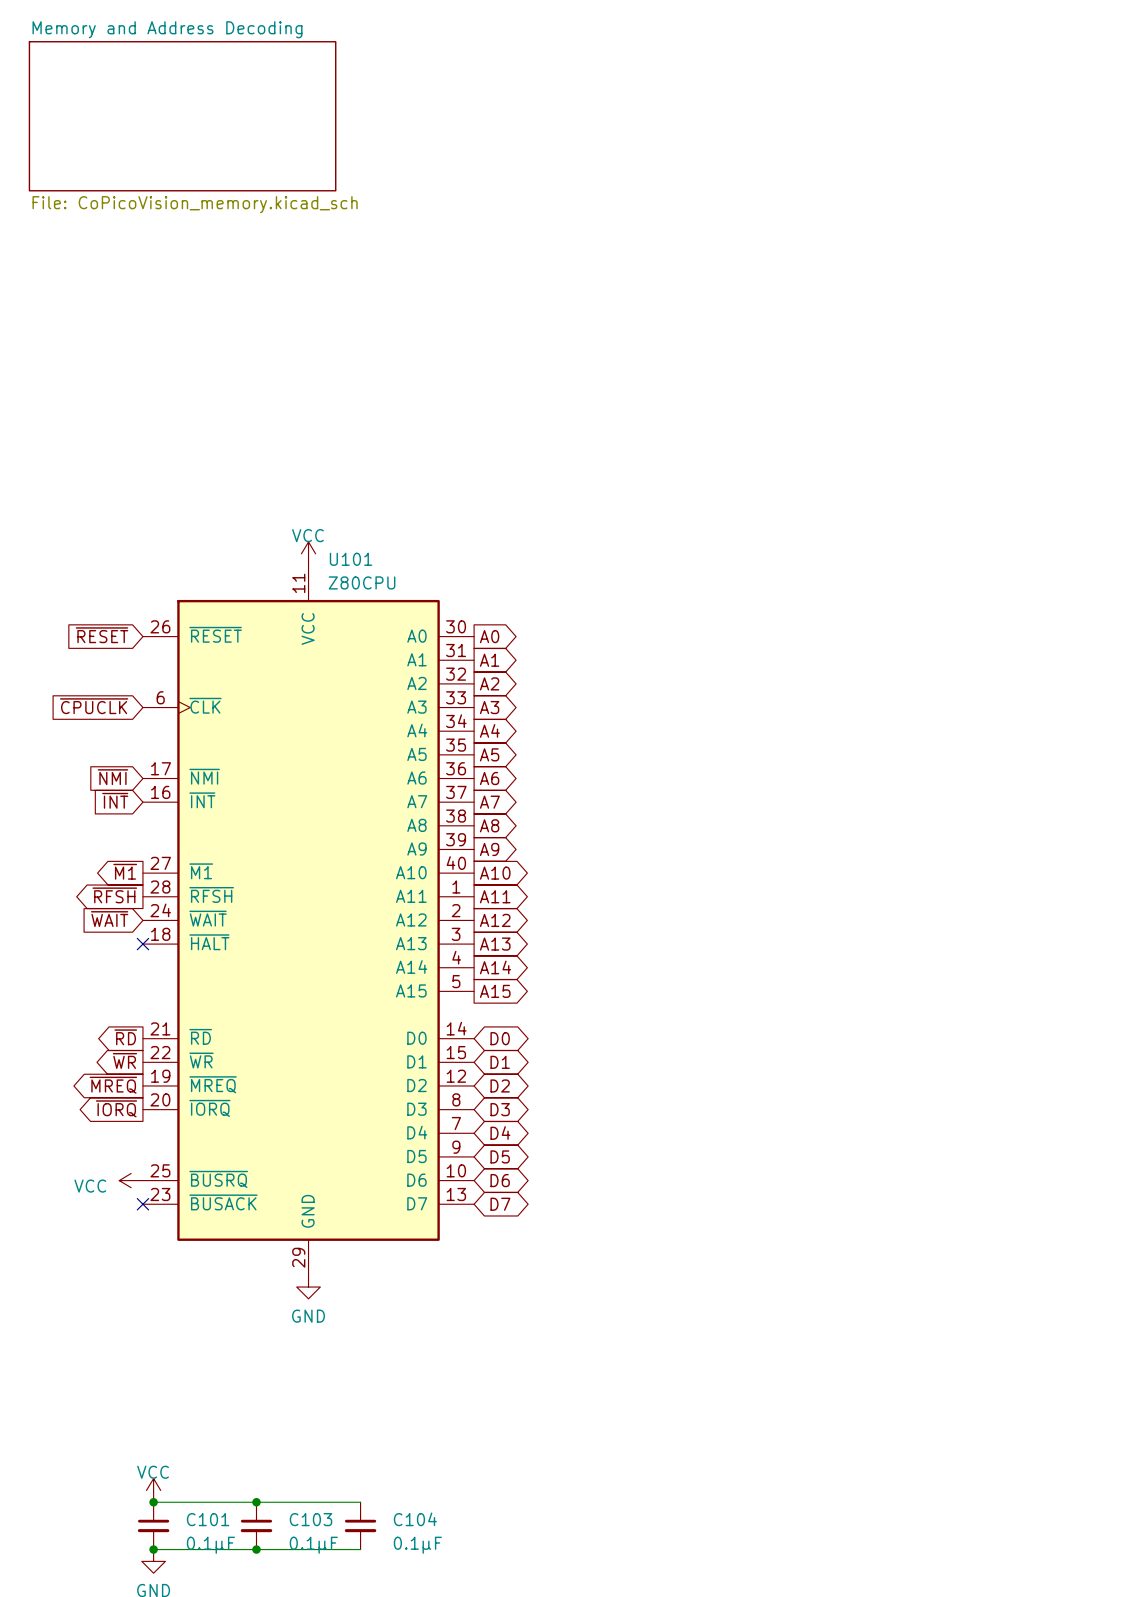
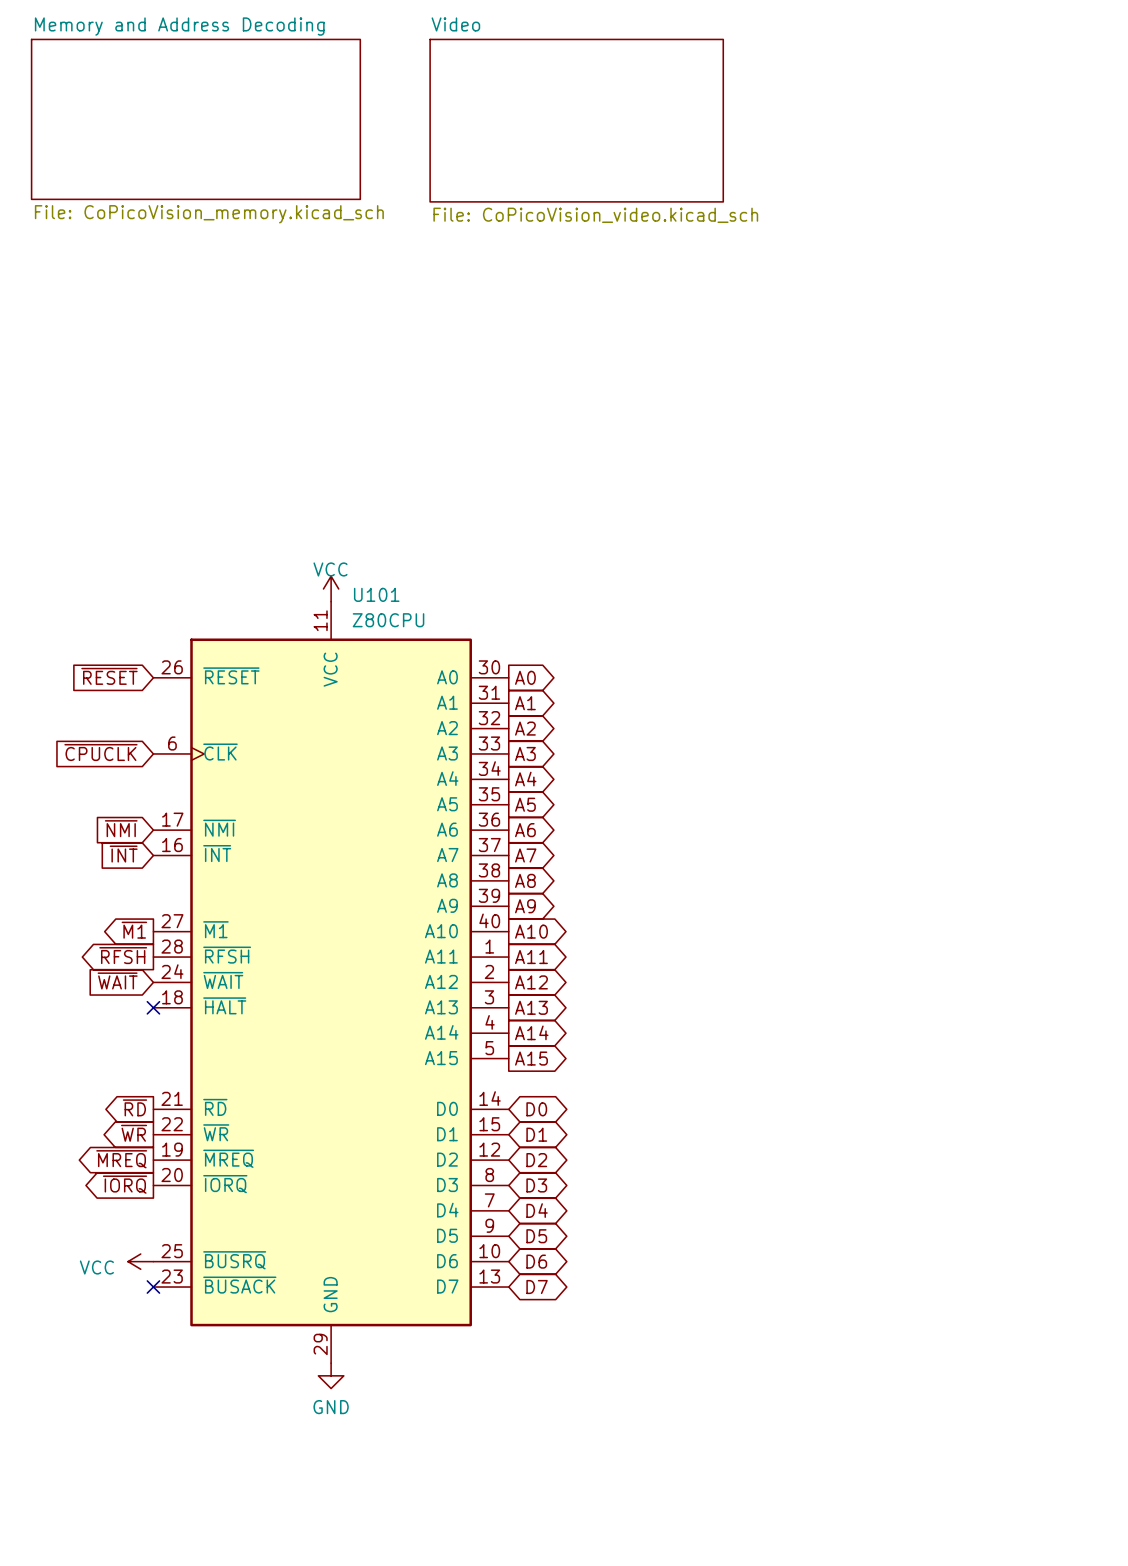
sheet Video: none -> File: CoPicoVision_video.kicad_sch (576, 120)

